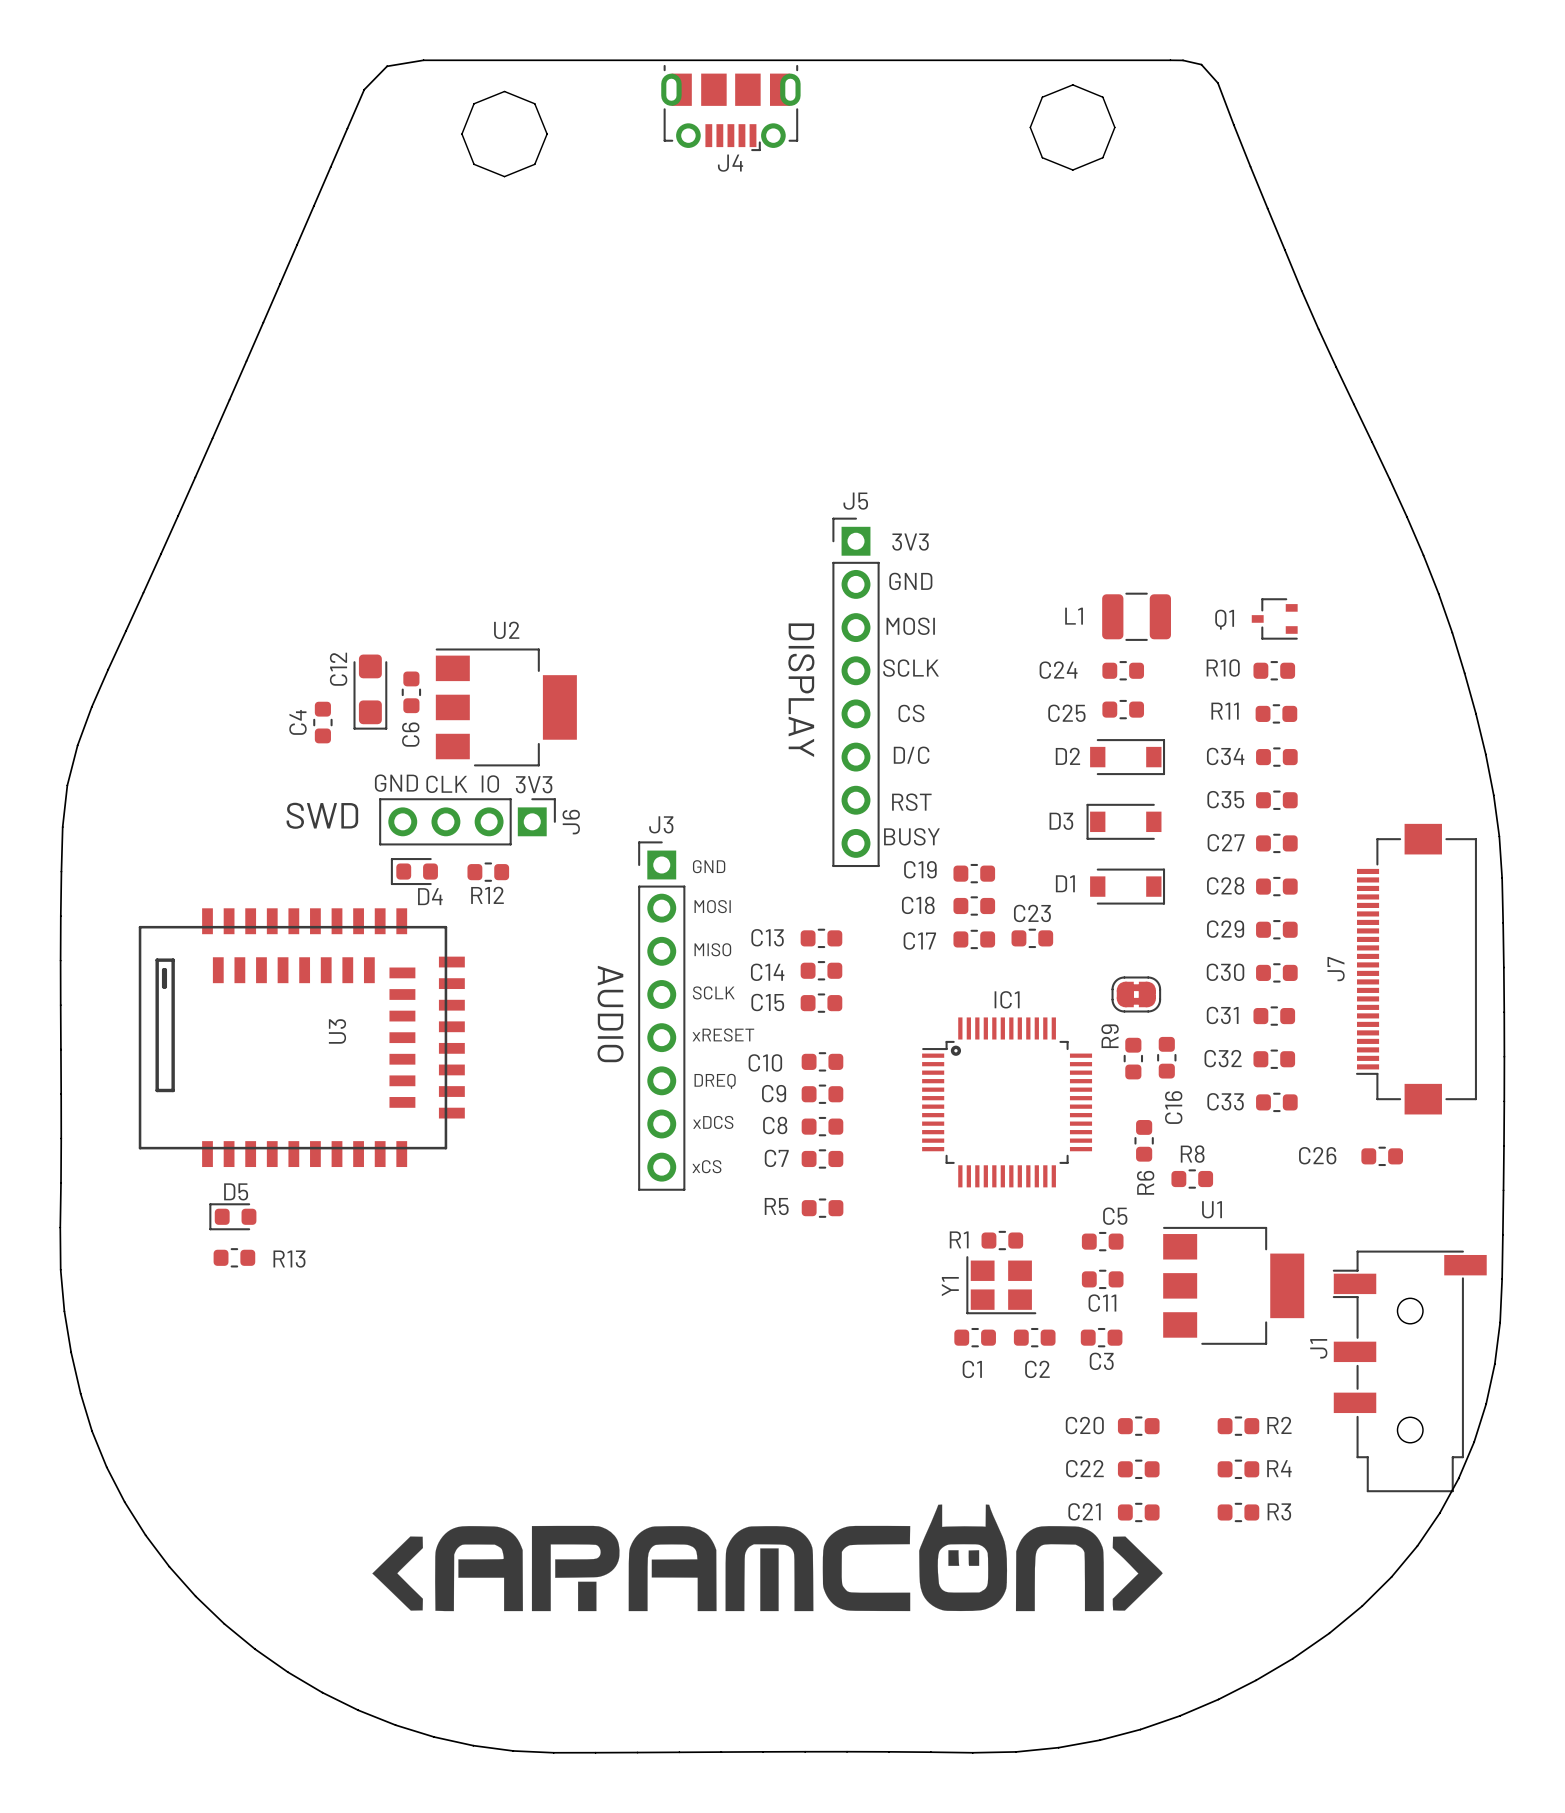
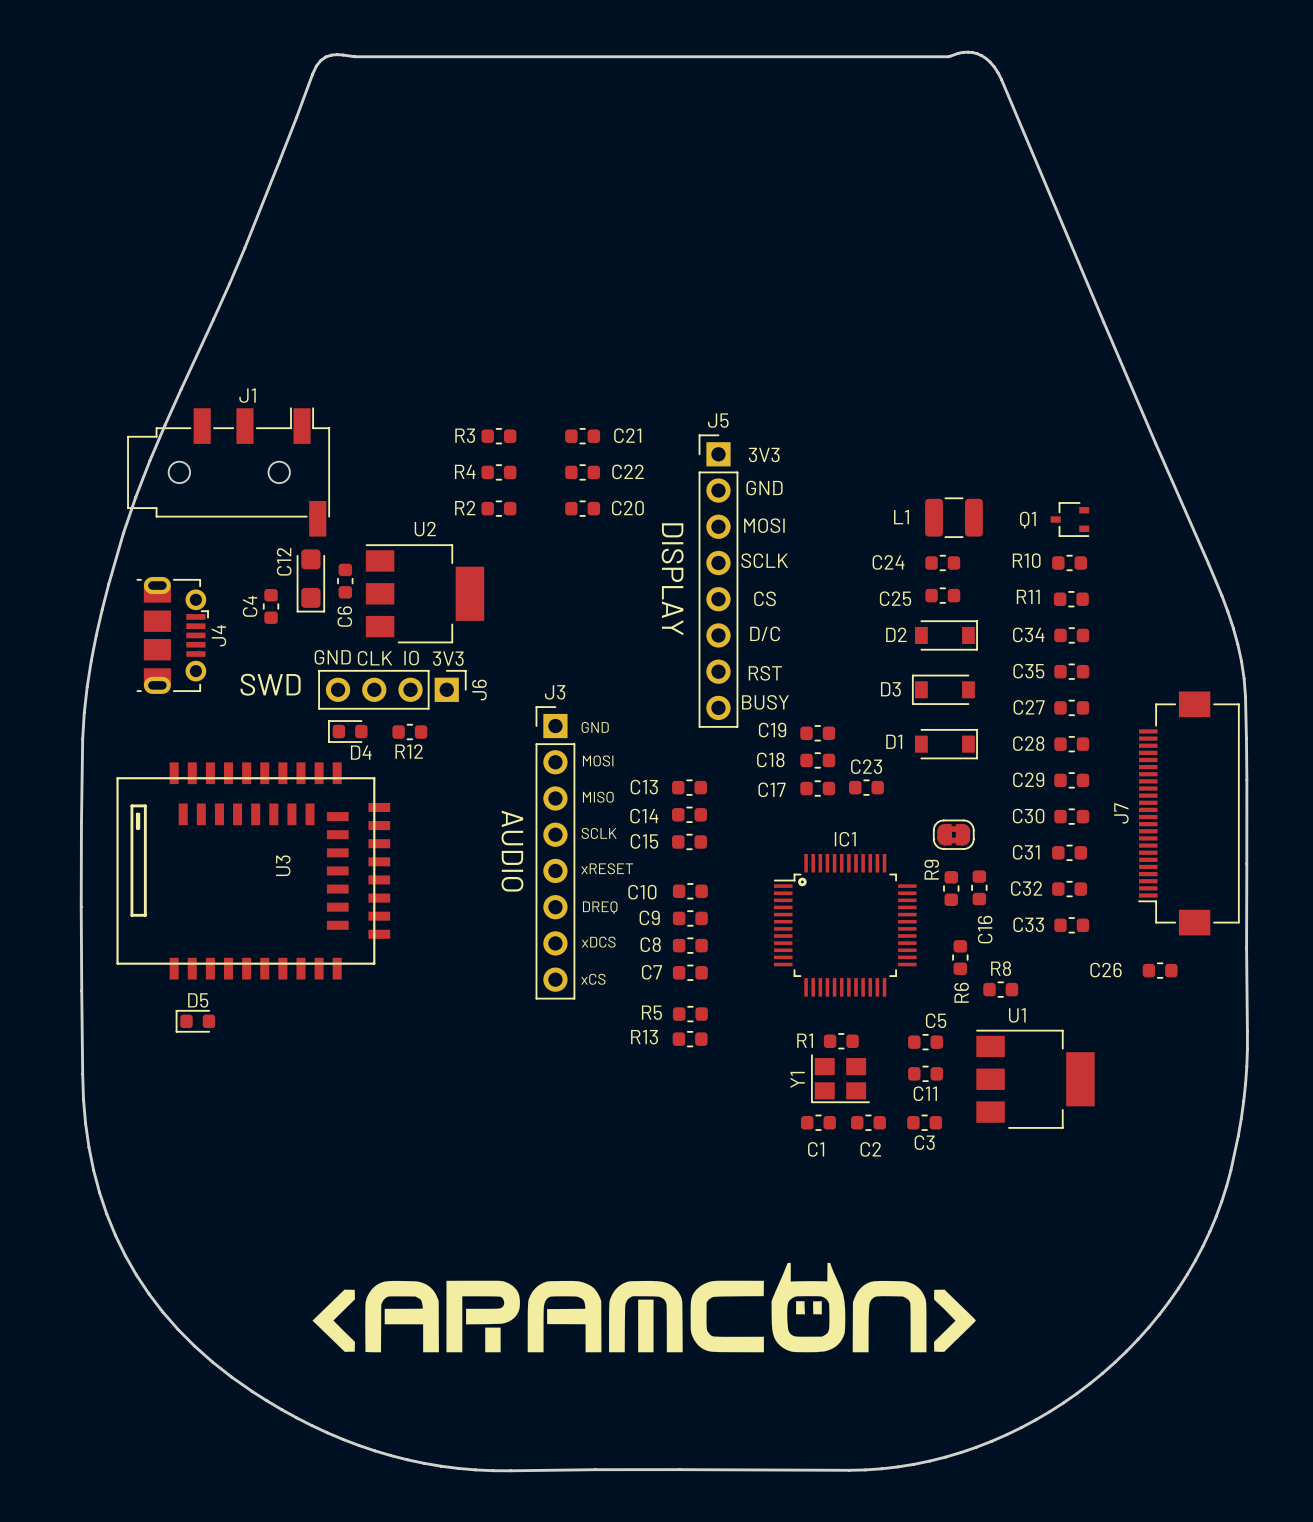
drawing: [59, 59, 1506, 1754] -> none
board edge: none -> (968, 52) (948, 56) (354, 56) (337, 54) (326, 56) (316, 65) (244, 247) (165, 425) (123, 533) (102, 609) (87, 686) (82, 738) (81, 822) (83, 1099) (93, 1170) (106, 1214) (136, 1275) (162, 1312) (177, 1329) (231, 1377) (266, 1400) (312, 1425) (358, 1445) (391, 1455) (441, 1466) (475, 1469) (849, 1470) (913, 1464) (945, 1457) (991, 1441) (1035, 1419) (1077, 1393) (1114, 1362) (1148, 1327) (1178, 1288) (1202, 1246) (1221, 1201) (1230, 1170) (1241, 1118) (1246, 1066) (1246, 738) (1245, 696) (1241, 661) (1233, 627) (1221, 595) (1001, 79) (994, 66) (985, 58) (977, 53) (968, 52)
J4 rotation: 0° (730, 108) -> 90° counterclockwise (172, 635)
J4 position: (730, 108) -> (172, 635)
R13 position: (234, 1257) -> (690, 1039)
R13 name position: R13 (289, 1259) -> R13 (644, 1037)
J1 rotation: 0° (1409, 1371) -> 90° clockwise (228, 471)
J1 position: (1409, 1371) -> (228, 471)
C20 name position: C20 (1084, 1425) -> C20 (627, 508)
R2 name position: R2 (1279, 1425) -> R2 (465, 508)
C20 position: (1138, 1426) -> (582, 508)
R2 position: (1238, 1426) -> (498, 508)
C22 name position: C22 (1084, 1468) -> C22 (628, 471)
R4 name position: R4 (1279, 1468) -> R4 (465, 471)
C22 position: (1138, 1469) -> (582, 472)
R4 position: (1238, 1469) -> (498, 472)
C21 name position: C21 (1084, 1511) -> C21 (627, 435)
R3 name position: R3 (1279, 1511) -> R3 (465, 435)
C21 position: (1138, 1512) -> (582, 436)
R3 position: (1238, 1512) -> (498, 436)

